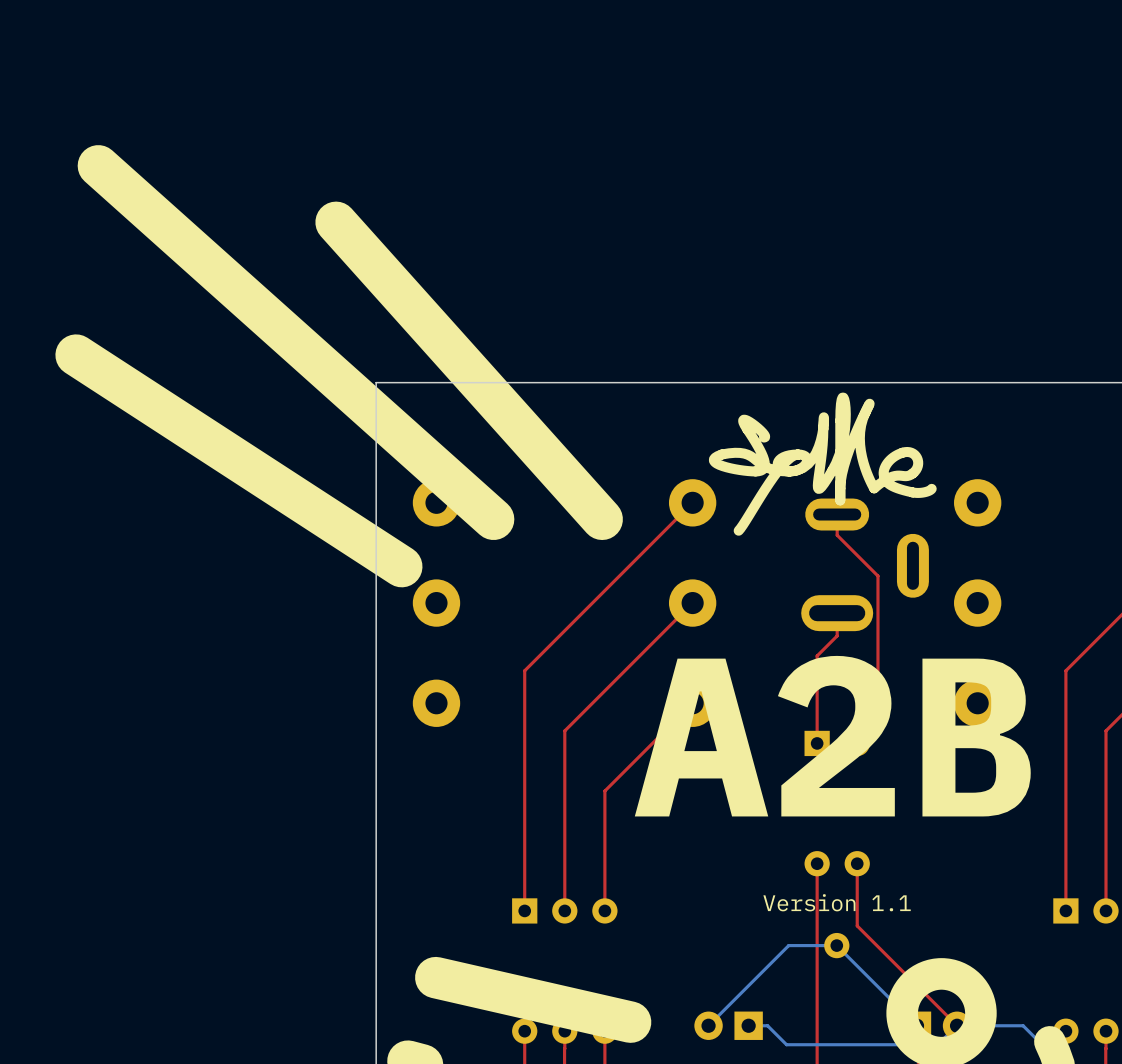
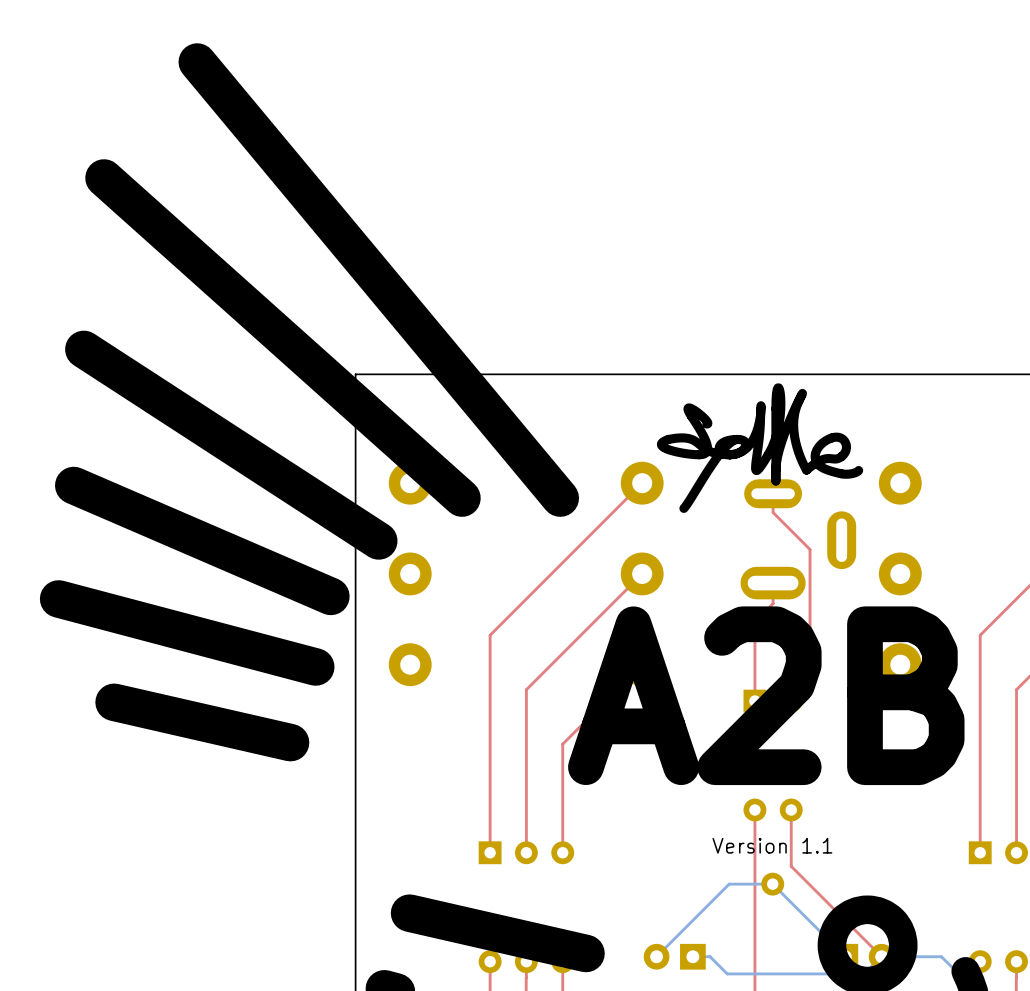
line: (336, 222) (602, 519) -> (197, 62) (560, 498)
line: none -> (73, 485) (330, 596)
line: none -> (58, 598) (315, 667)
line: none -> (114, 702) (290, 742)

